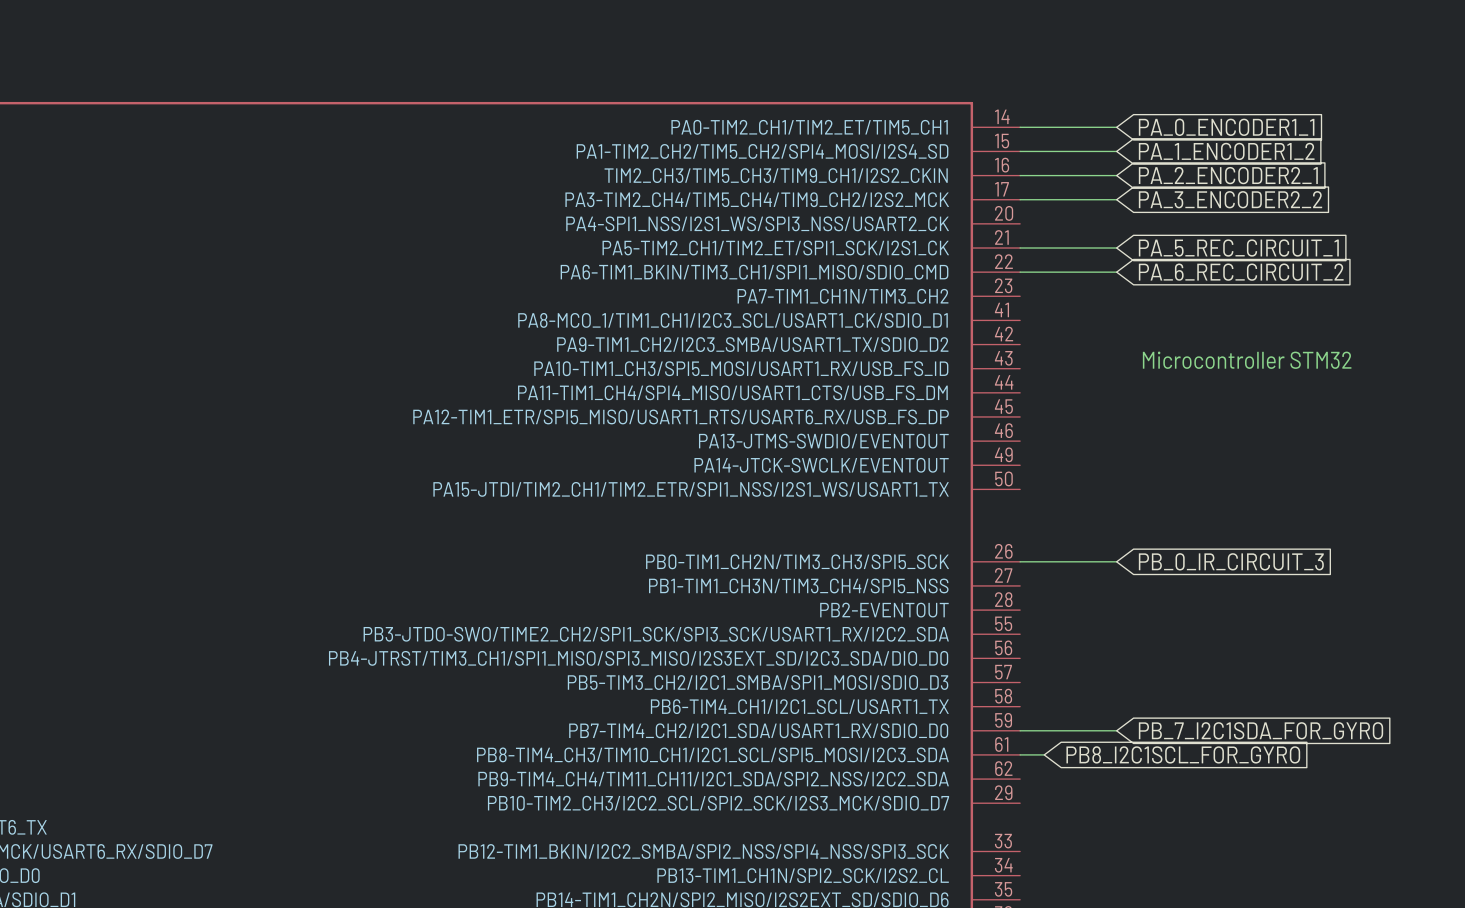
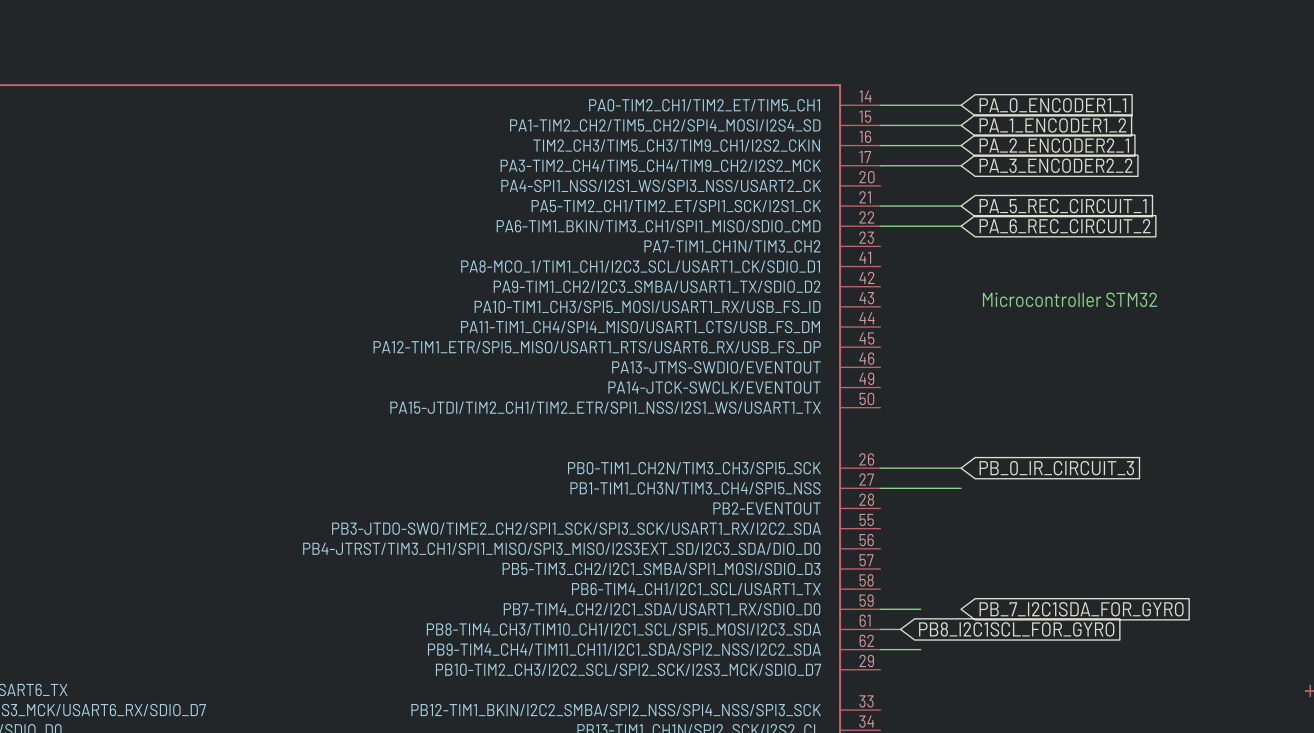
wire: none -> (880, 488) (961, 488)
wire: (1068, 730) (1116, 730) -> (880, 649) (920, 649)

